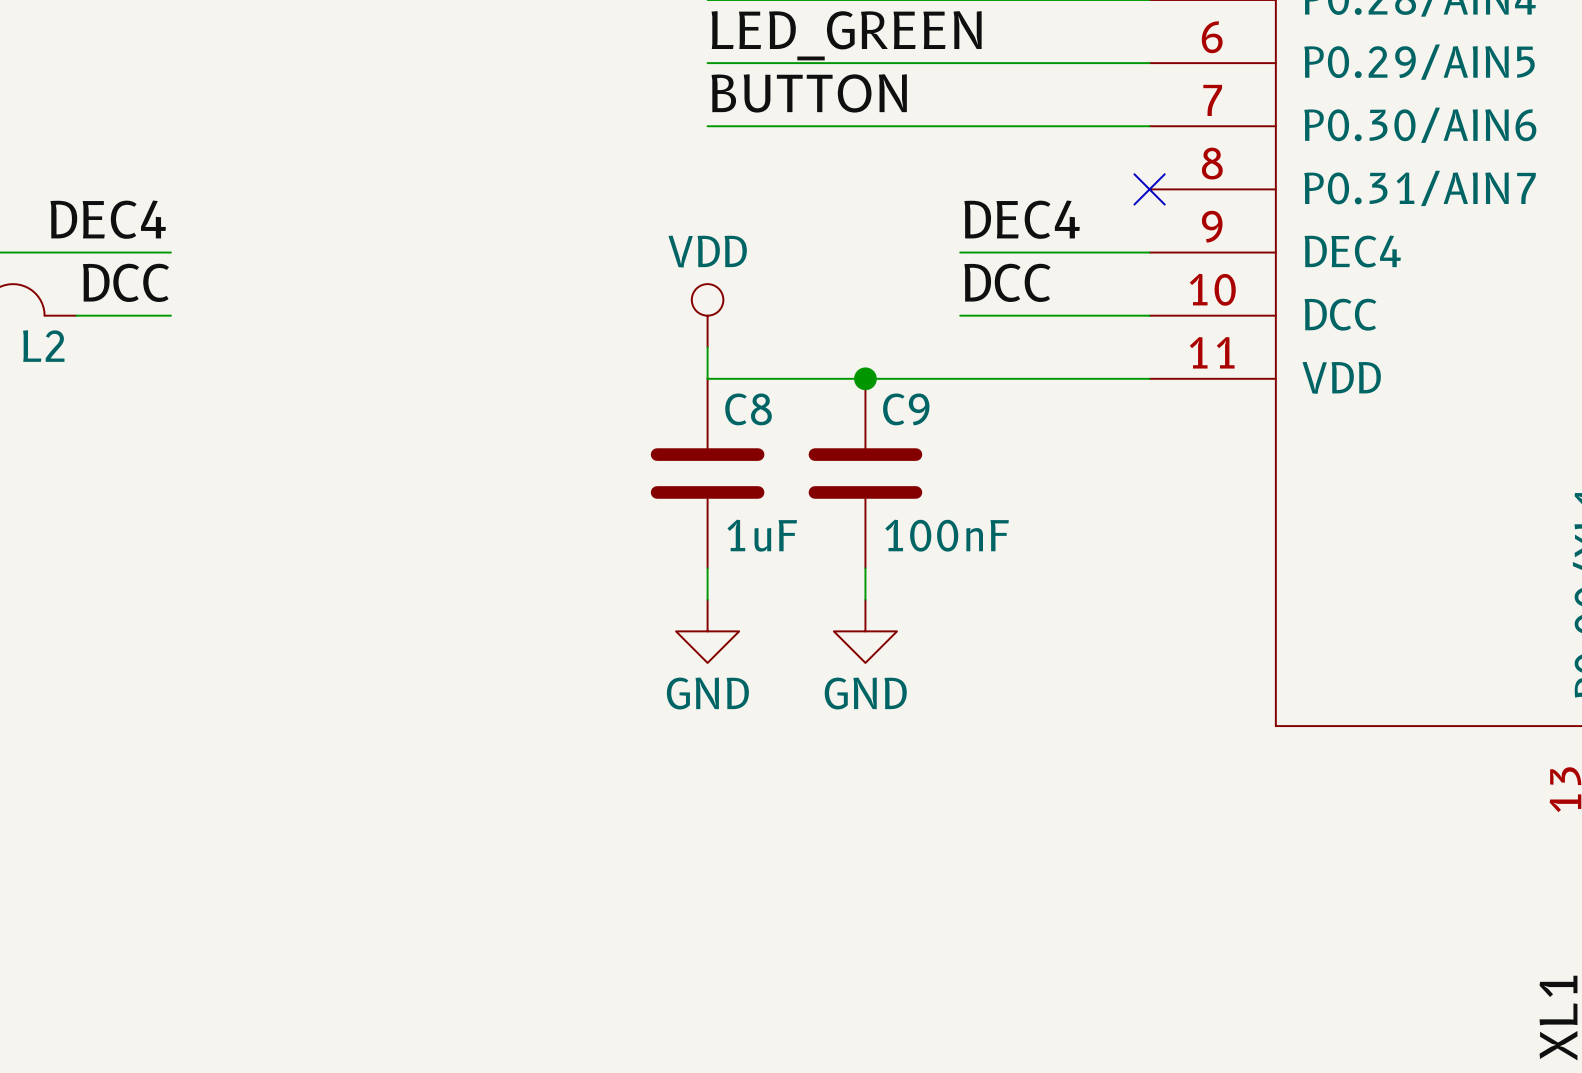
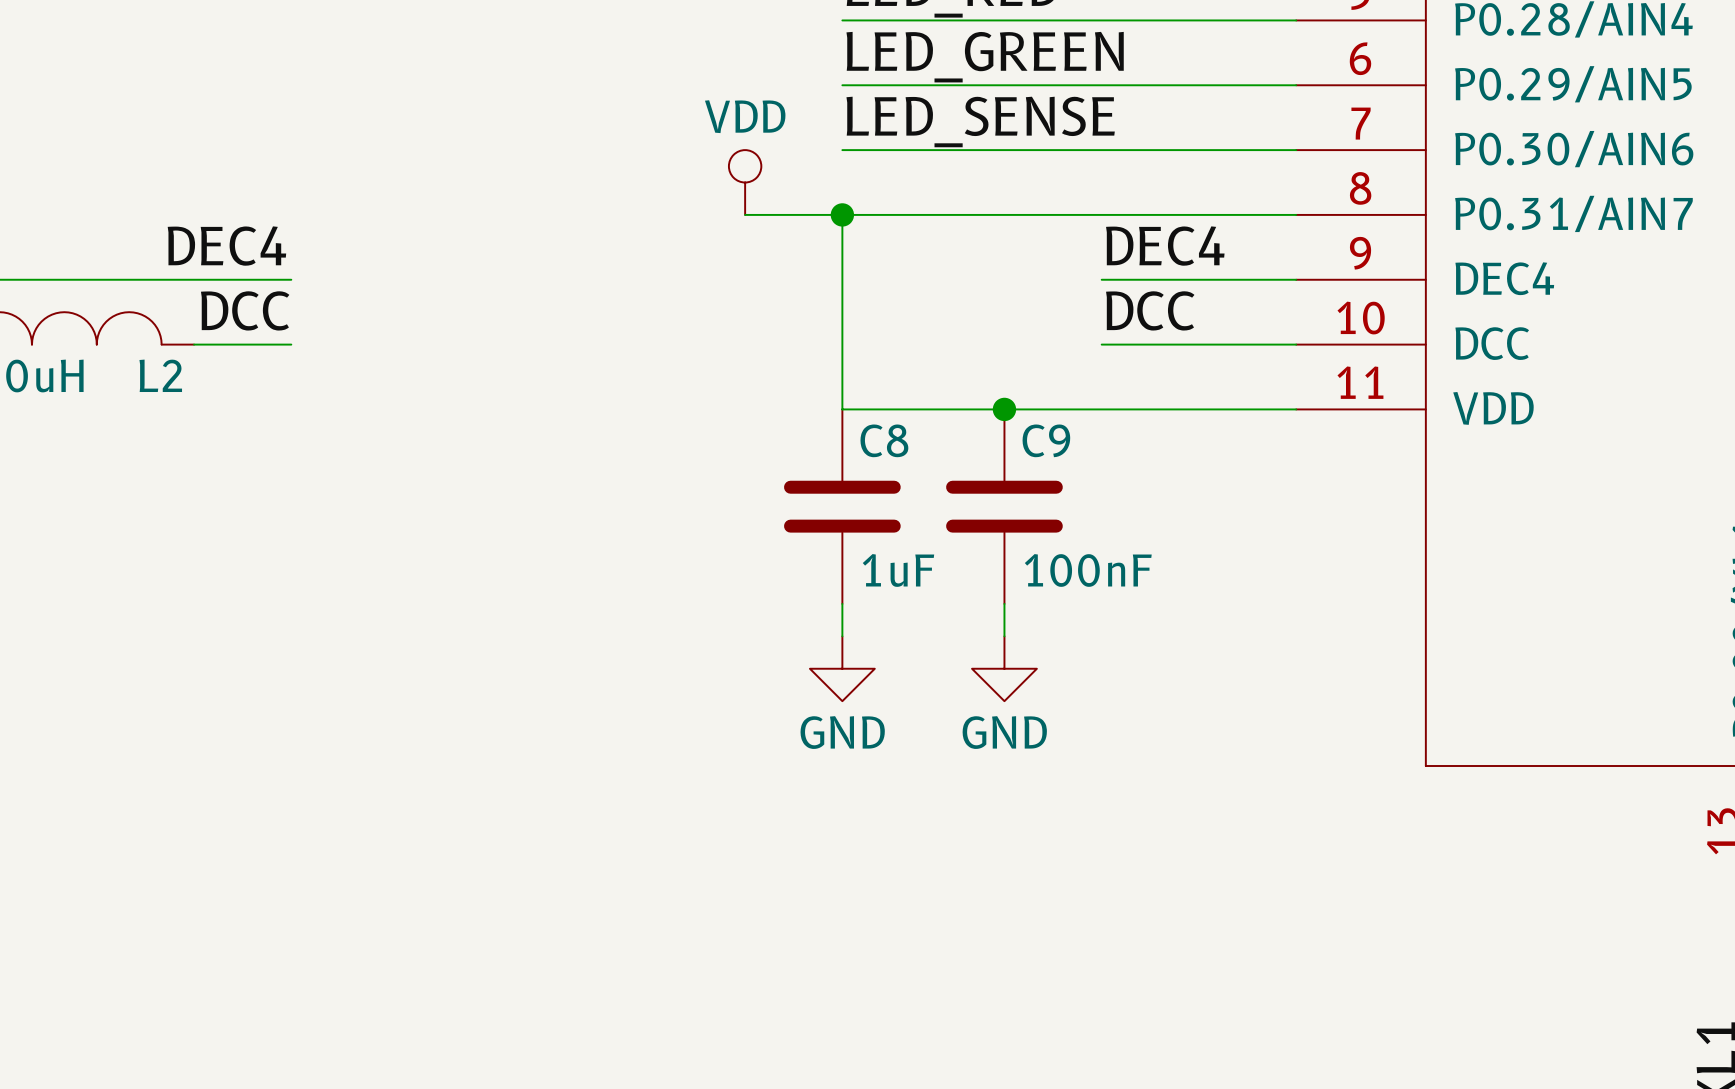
label: BUTTON (809, 93) -> LED_SENSE (980, 121)
wire: none -> (745, 214) (1296, 214)
wire: none -> (842, 214) (842, 377)
junction: none -> (842, 214)
no-connect mark: (1149, 189) -> none
power symbol position: VDD (707, 315) -> VDD (745, 182)

